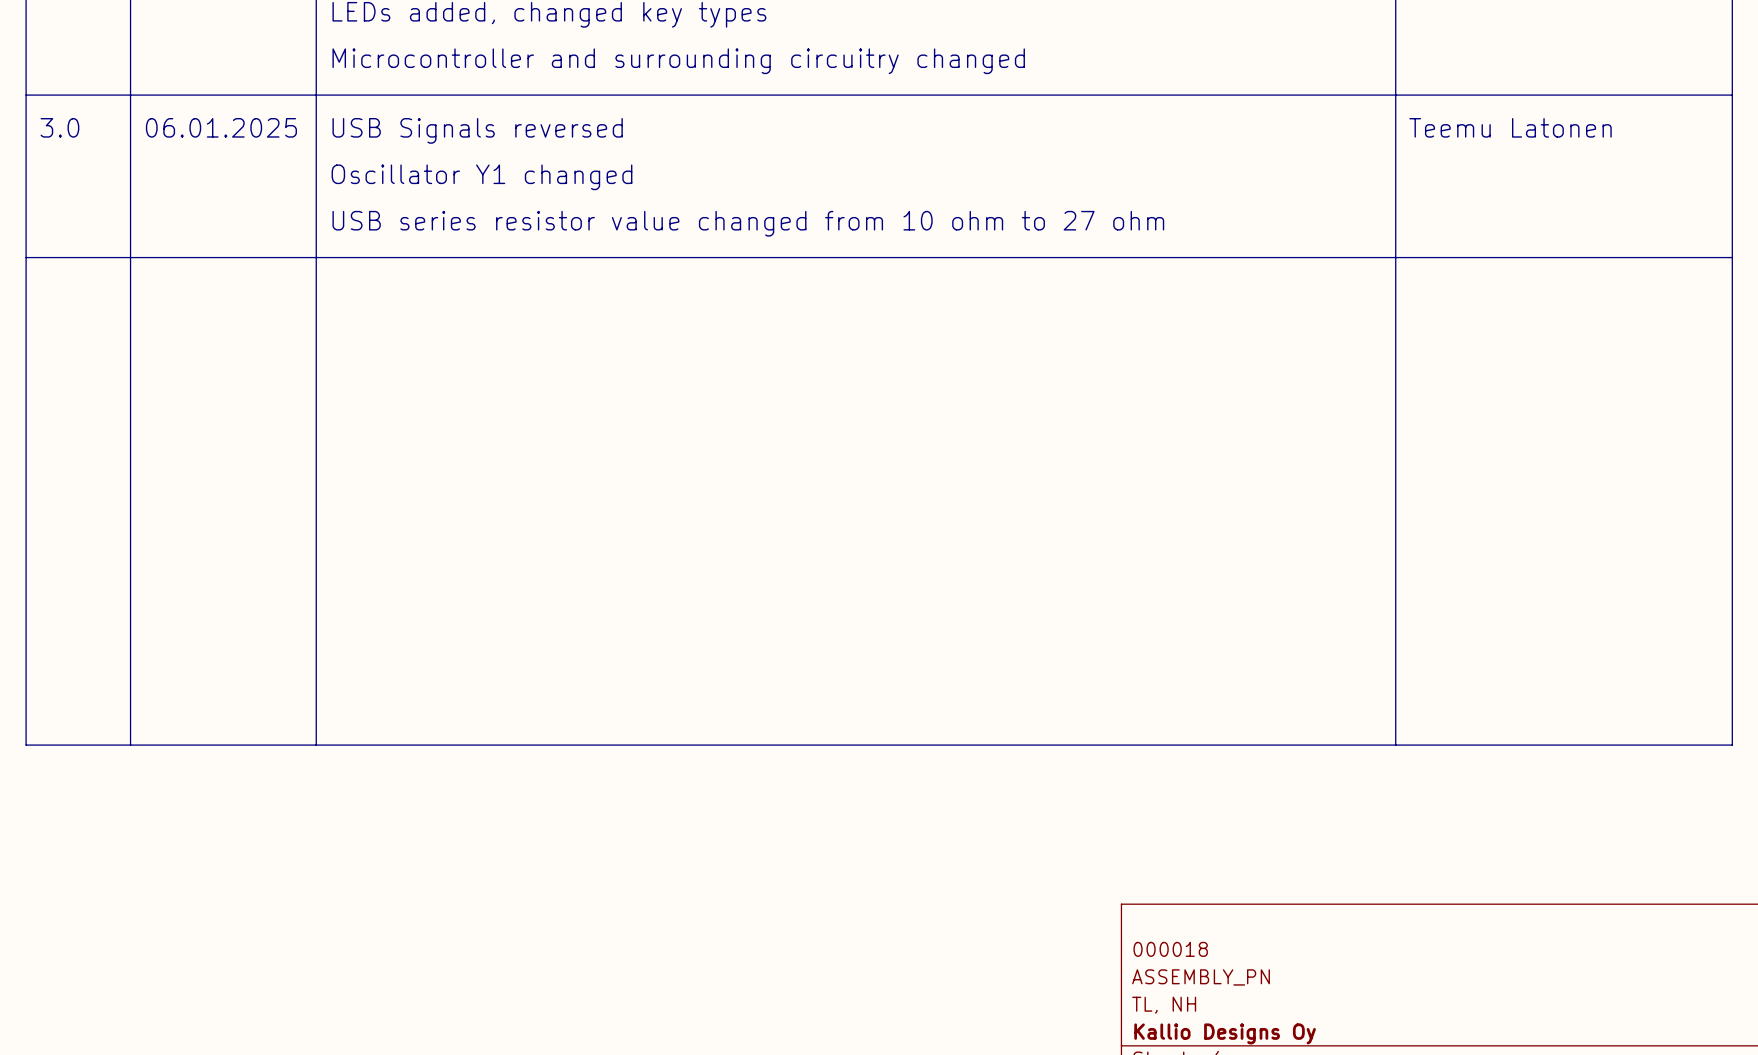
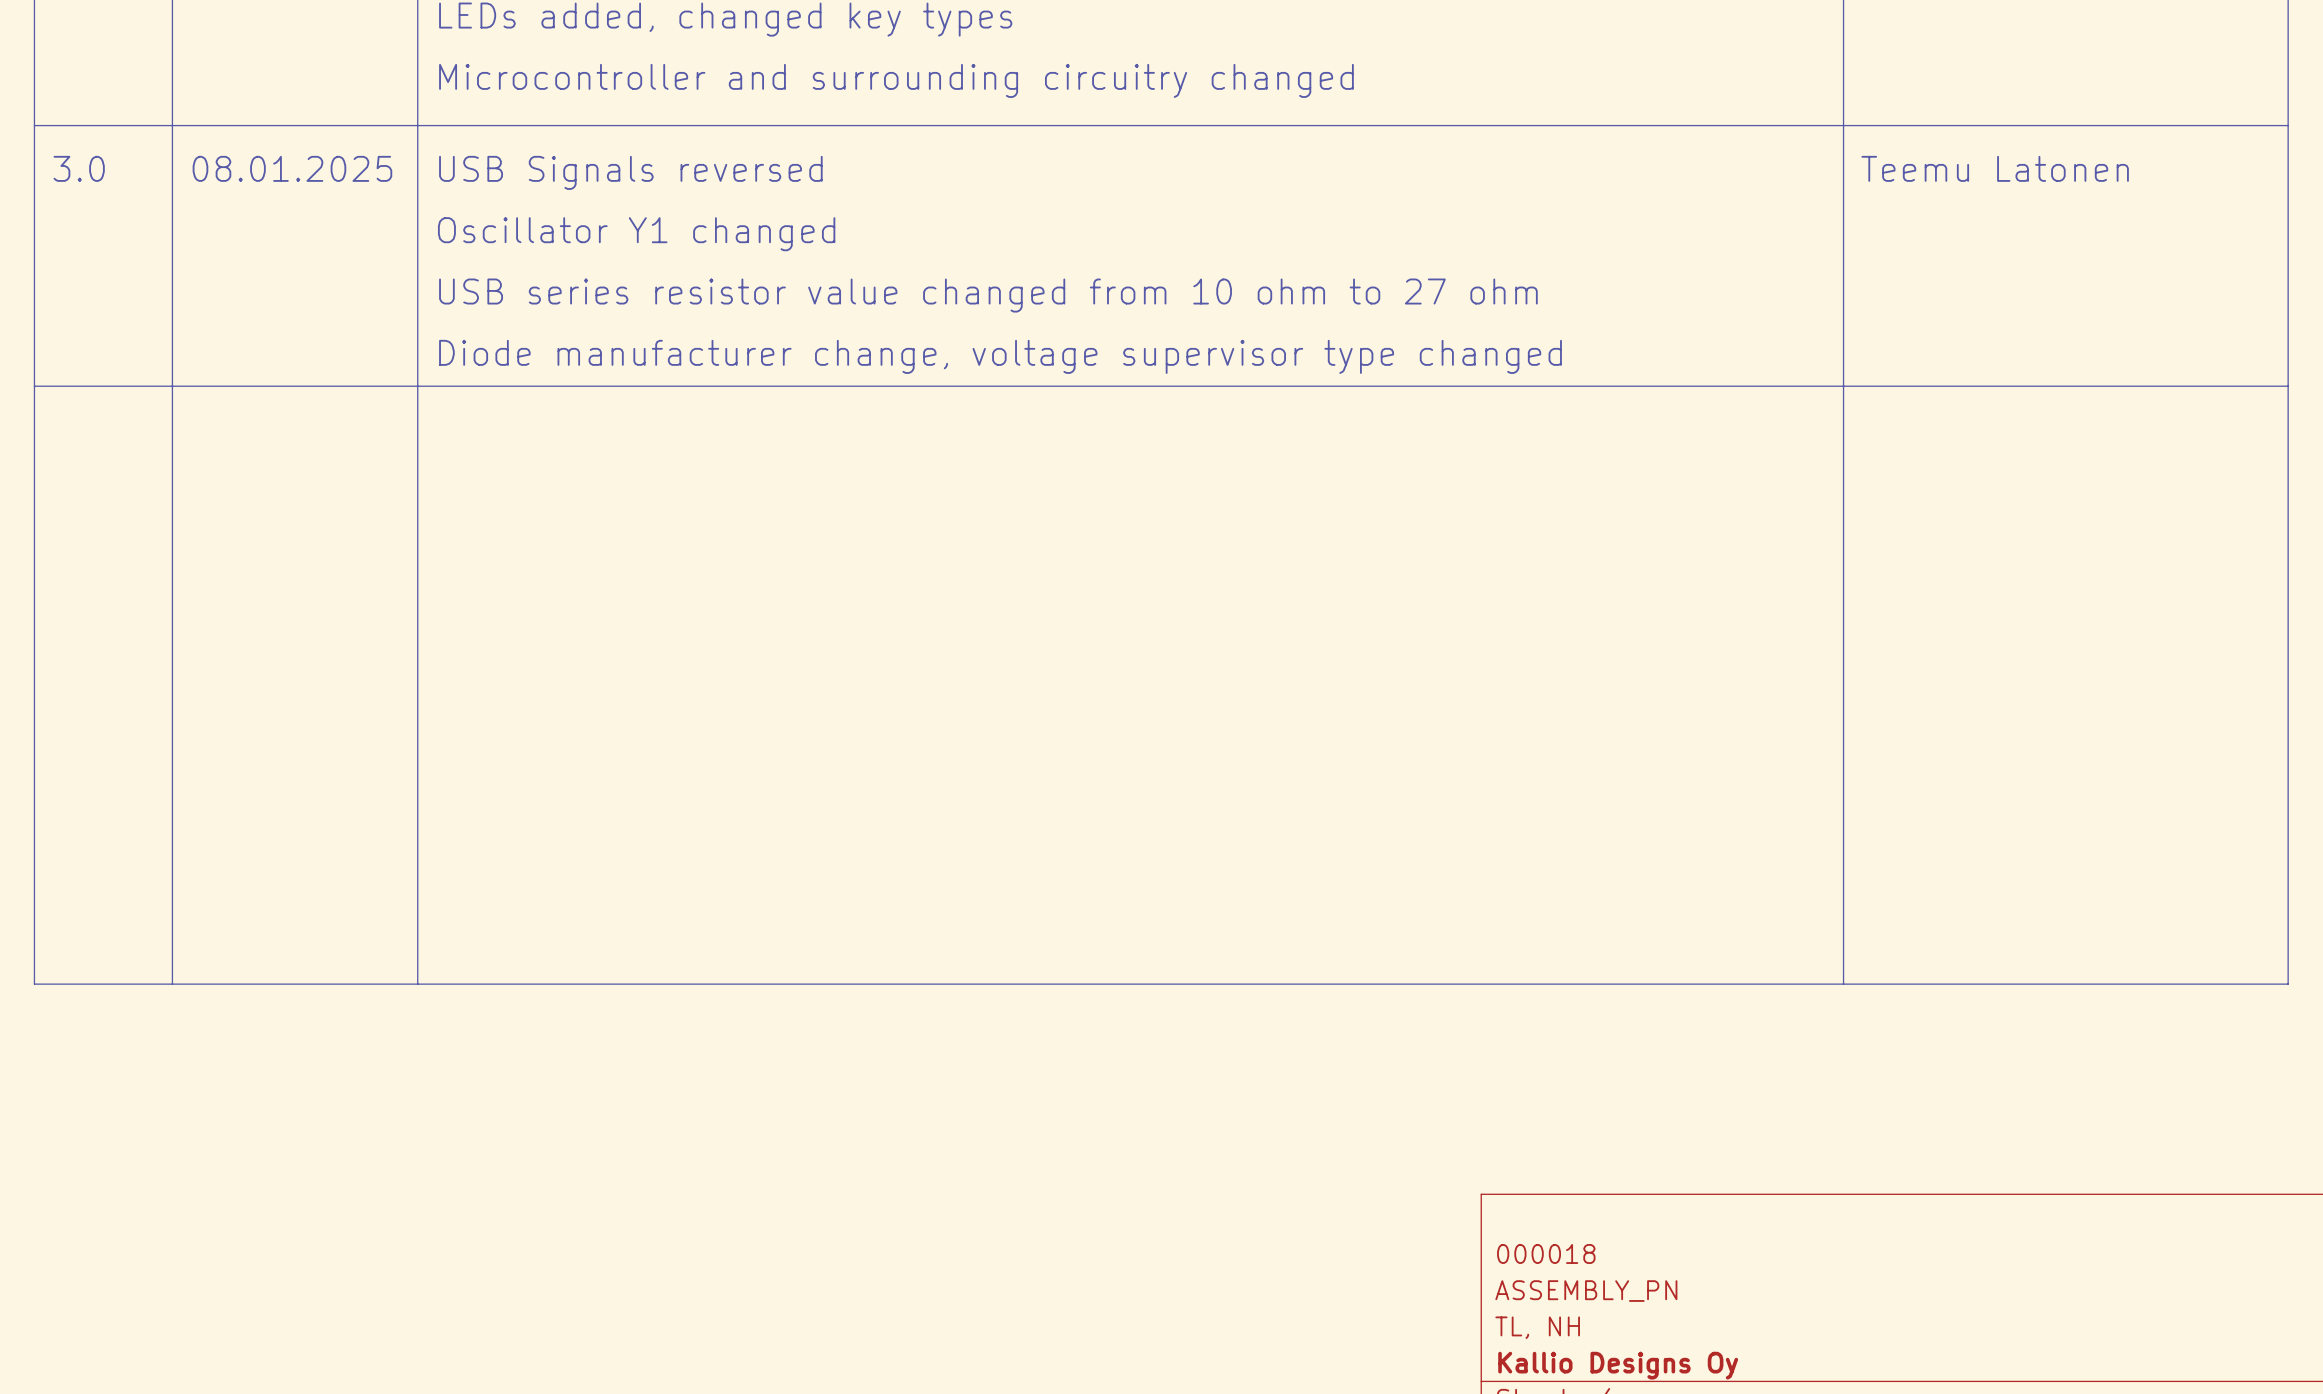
text: 06.01.2025 (221, 127) -> 08.01.2025 (292, 168)
line: (26, 257) (1732, 257) -> (34, 386) (2288, 386)
text: none -> Diode manufacturer change, voltage supervisor type changed (1000, 356)

